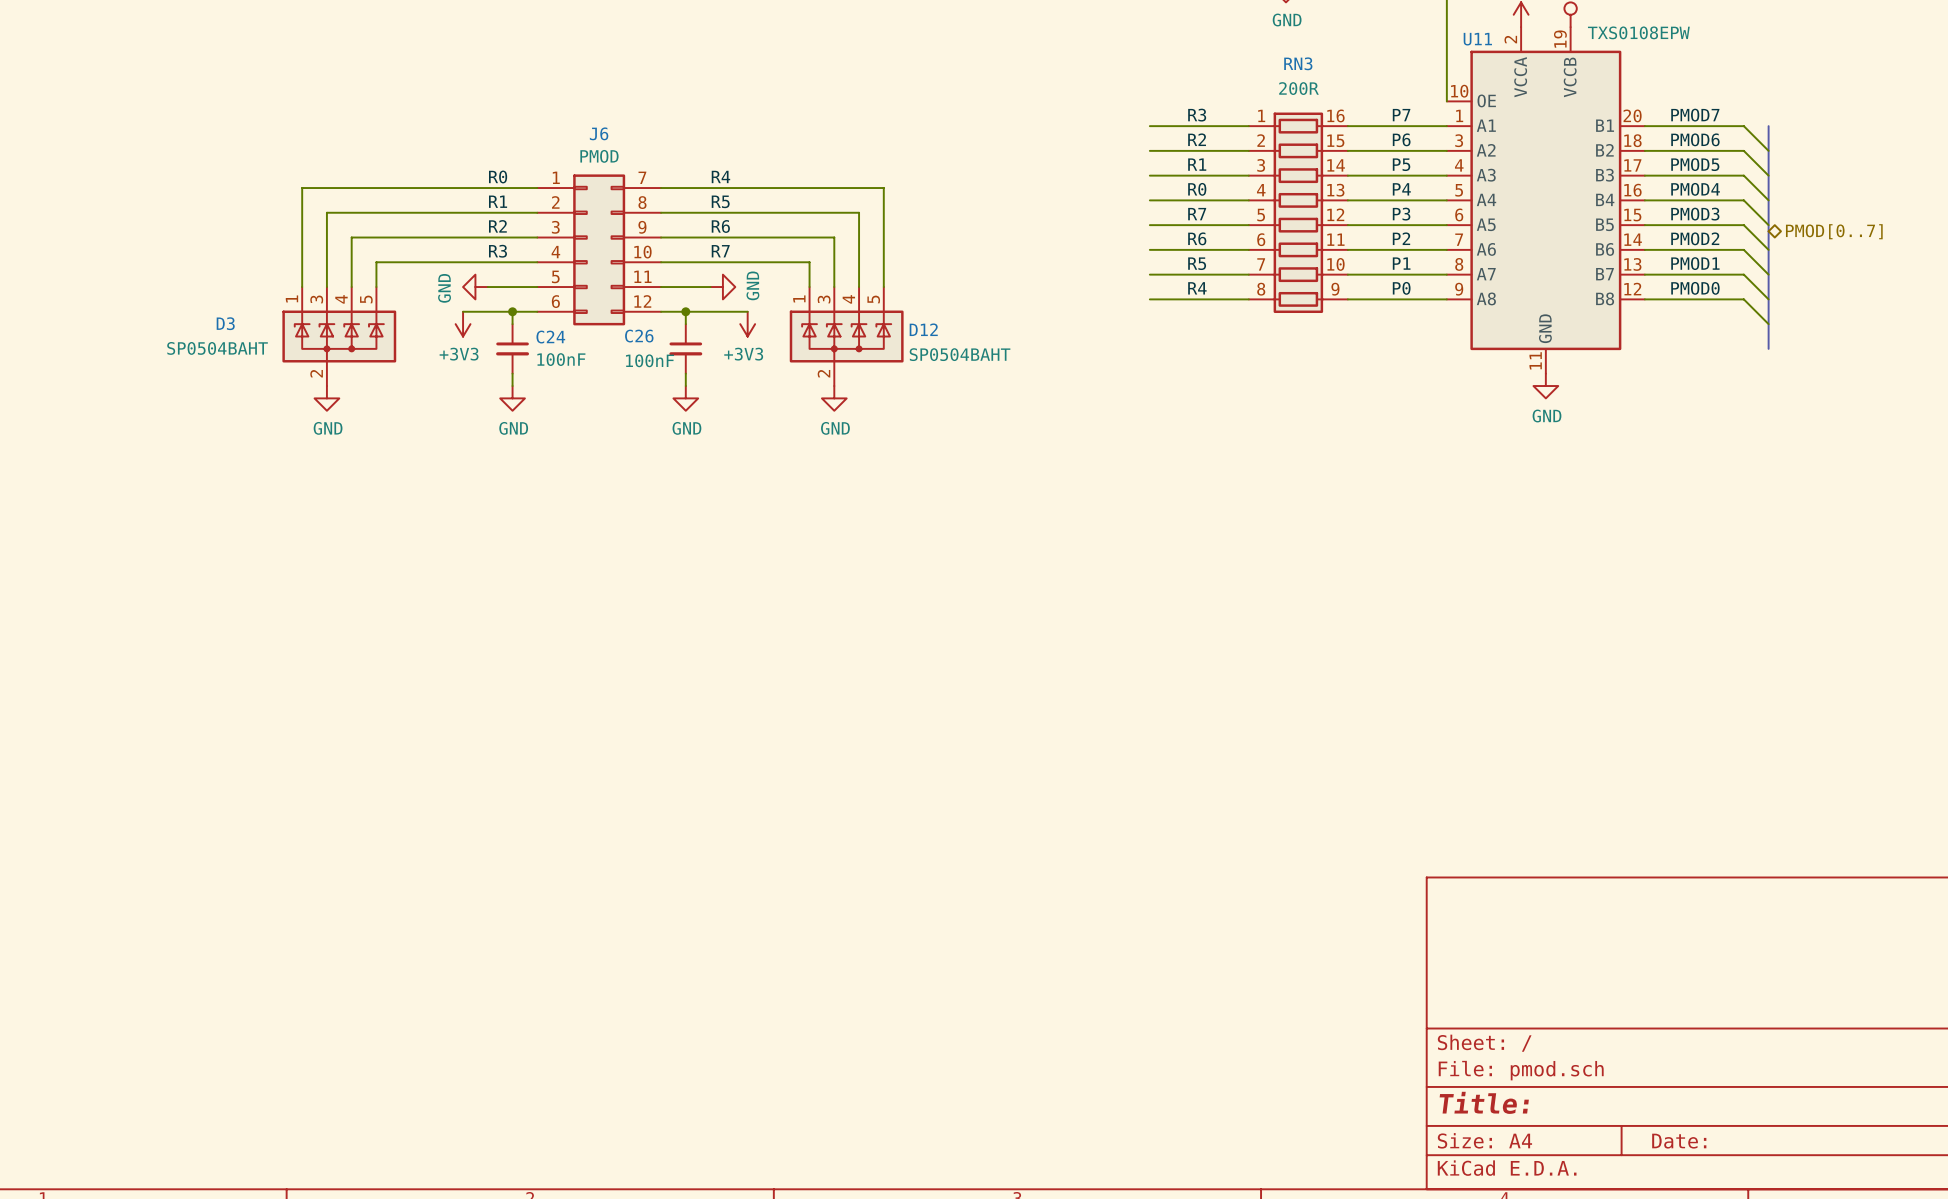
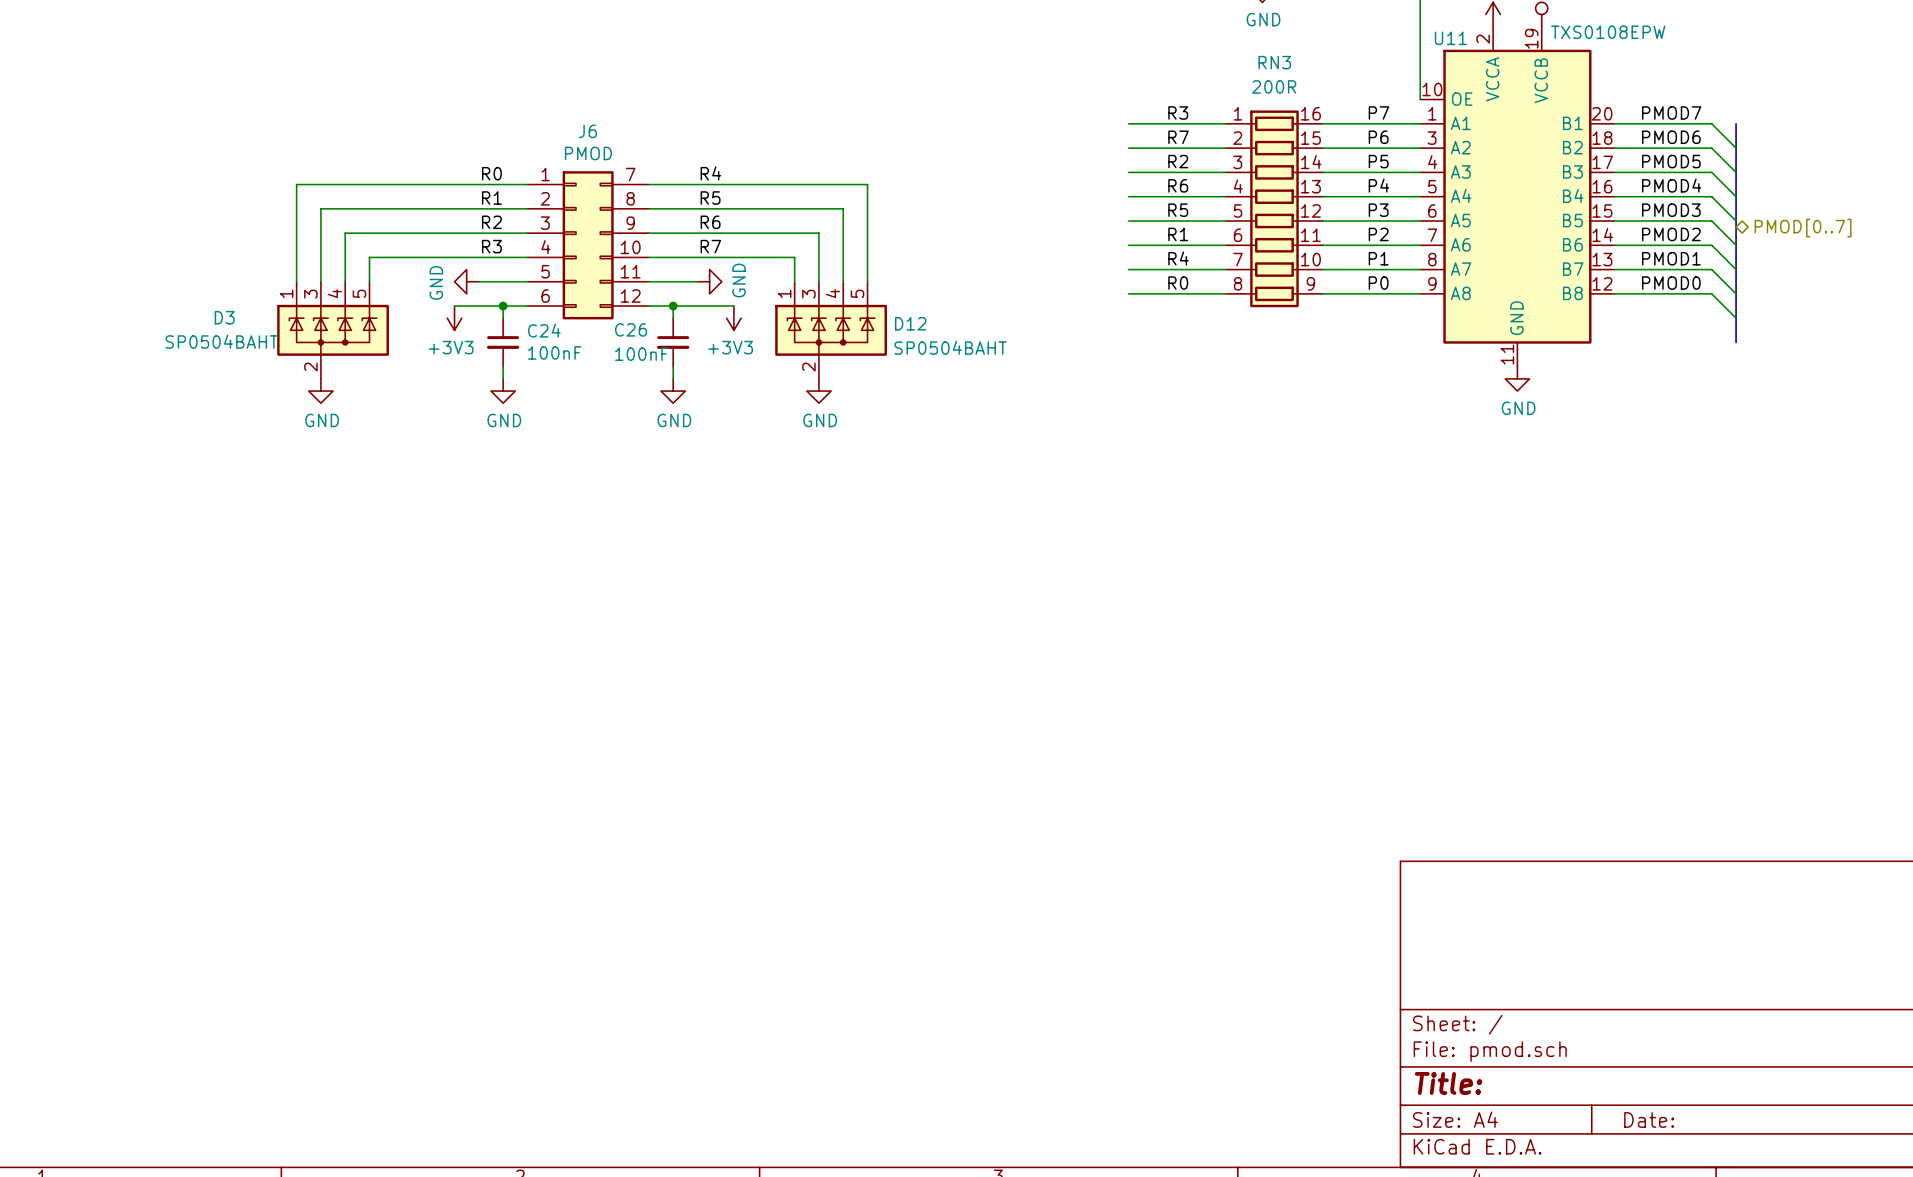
label: R2 (1197, 139) -> R7 (1178, 137)
label: R1 (1197, 164) -> R2 (1178, 161)
label: R0 (1197, 189) -> R6 (1178, 185)
label: R7 (1197, 214) -> R5 (1178, 210)
label: R6 (1197, 238) -> R1 (1178, 234)
label: R5 (1197, 263) -> R4 (1178, 258)
label: R4 (1197, 288) -> R0 (1178, 283)

